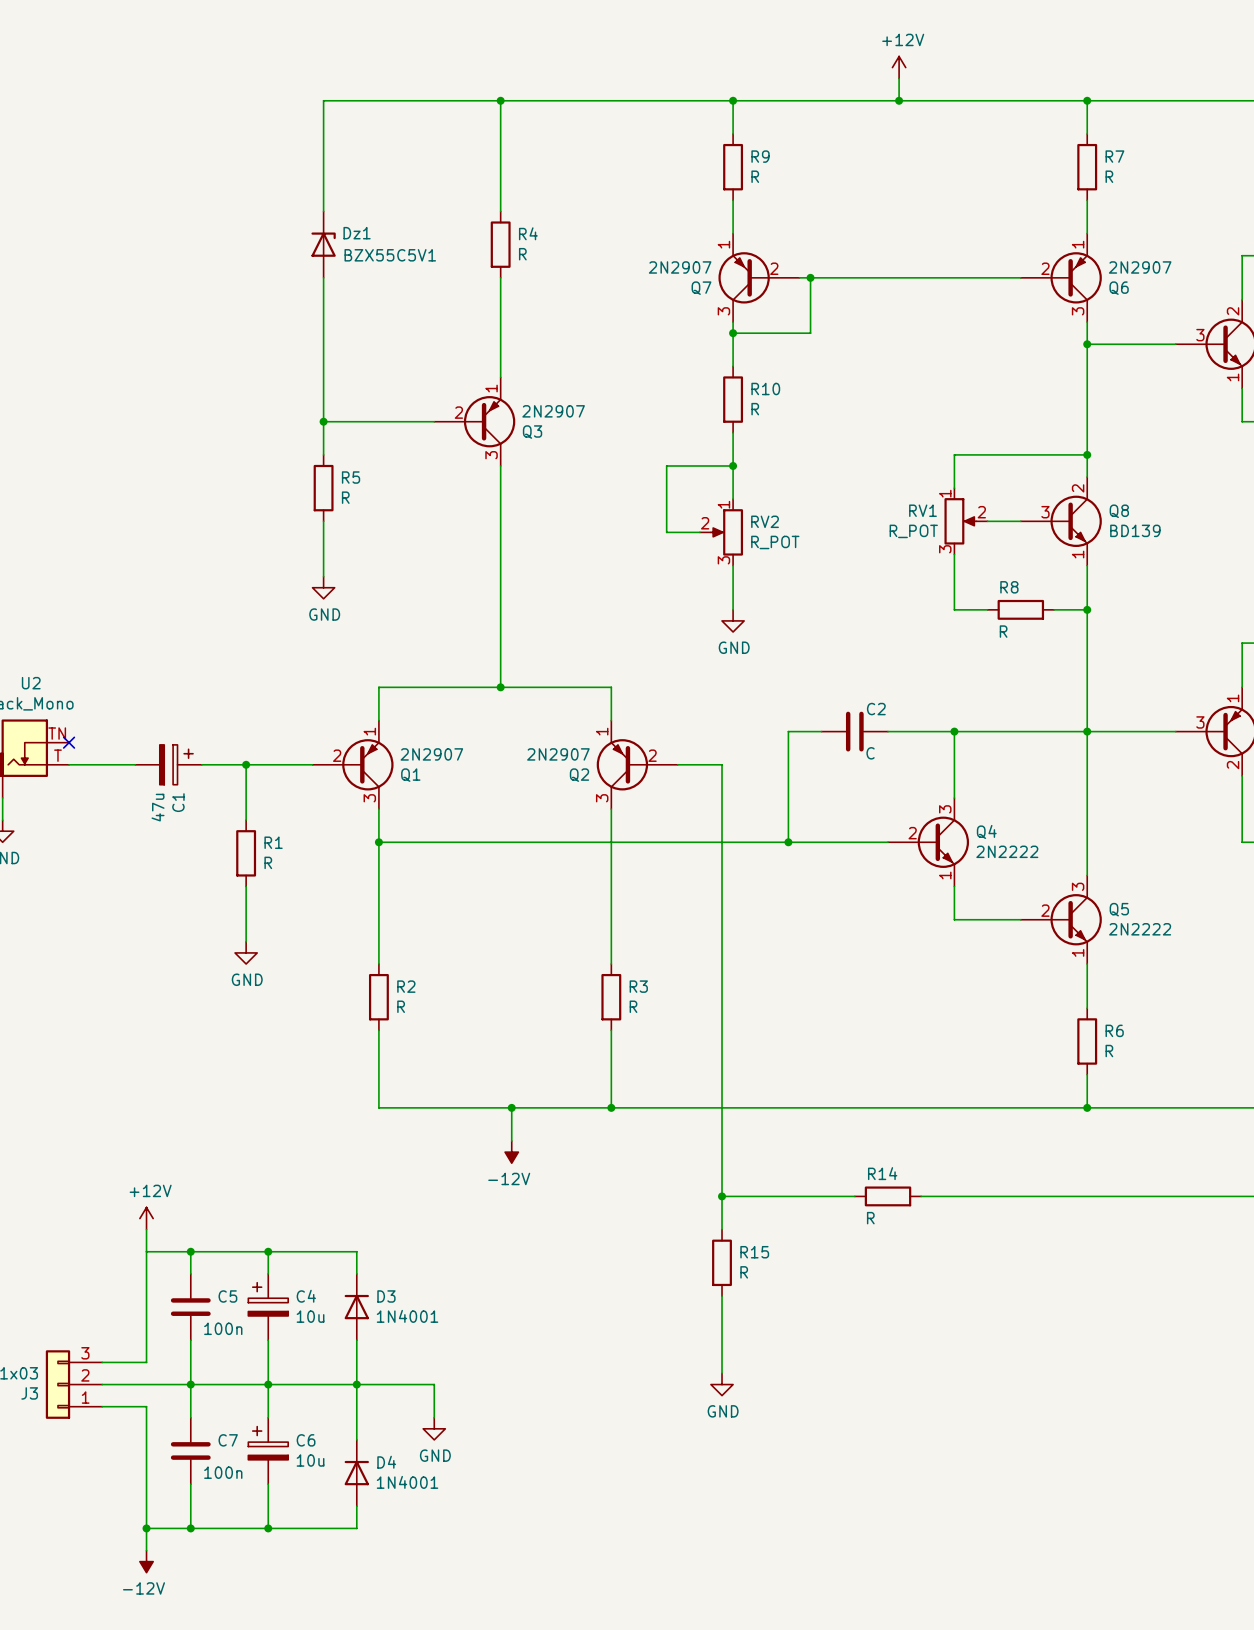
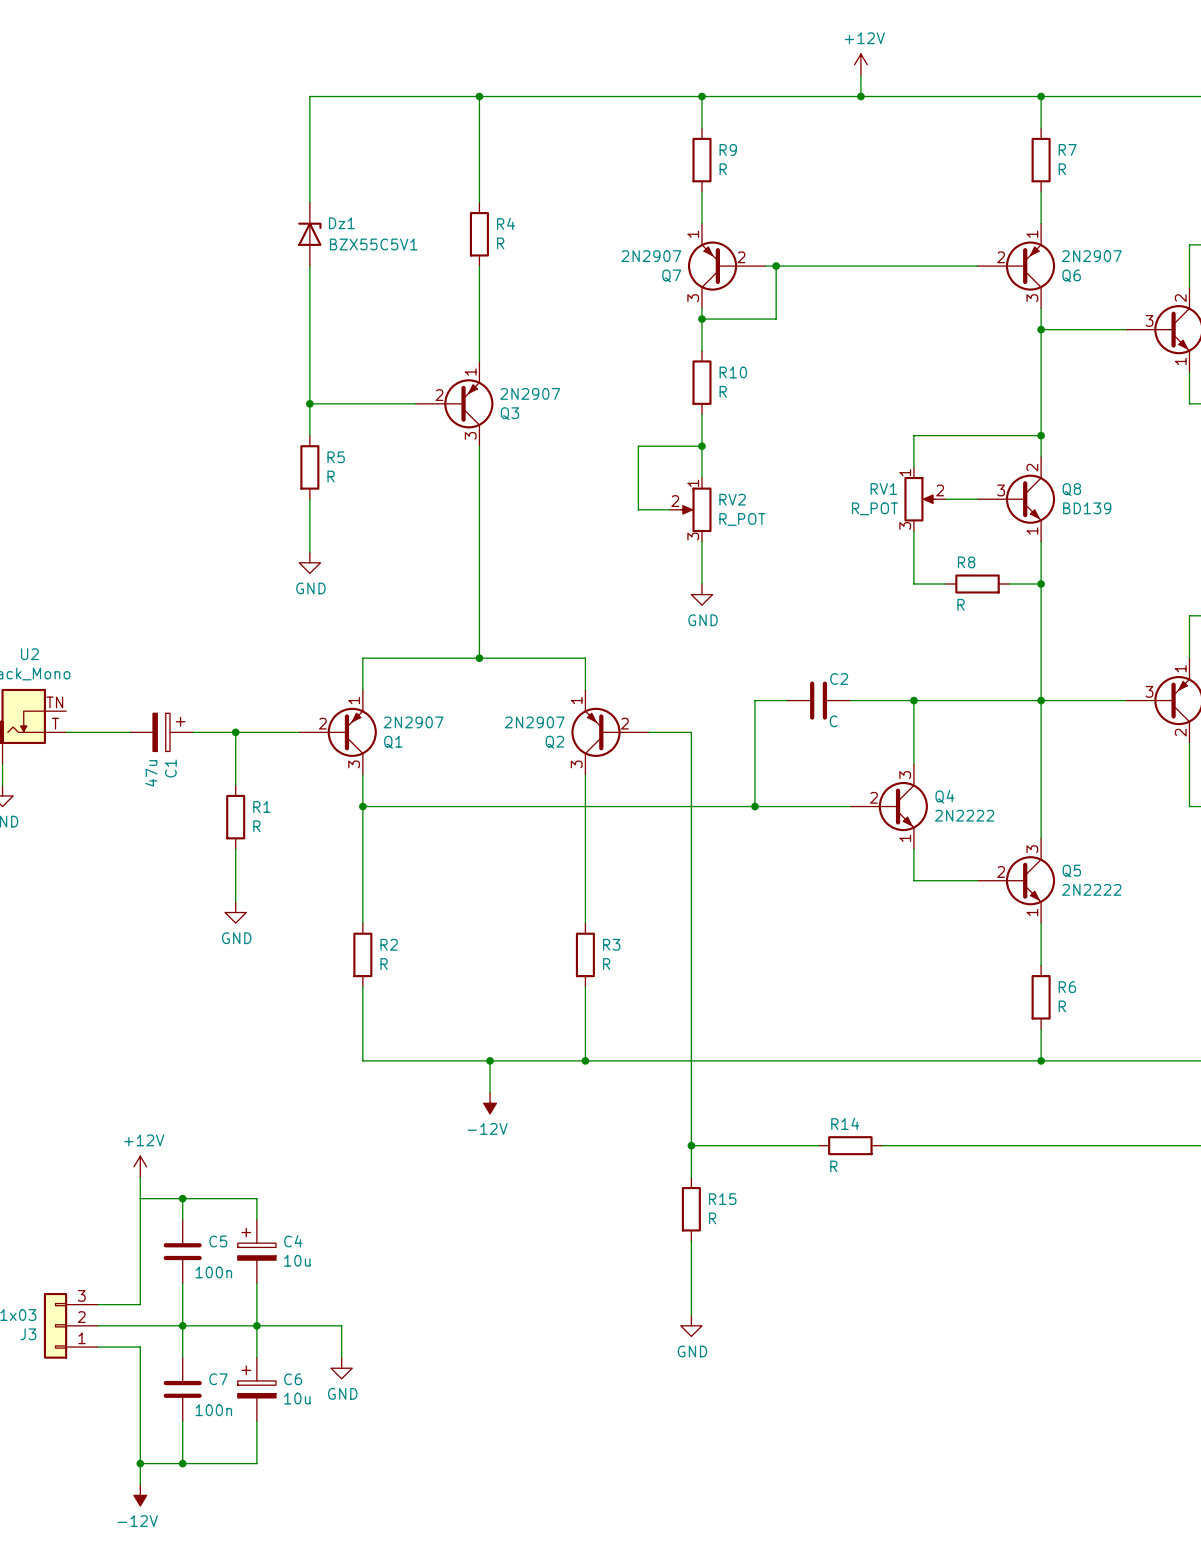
no-connect mark: (69, 742) -> none
wire: (268, 1251) (356, 1251) (356, 1273) -> none
junction: (268, 1251) -> none
D3: 1N4001 (356, 1307) -> none
wire: (356, 1340) (356, 1384) (434, 1384) (434, 1417) -> none
junction: (356, 1384) -> none
power symbol position: GND (434, 1428) -> GND (341, 1368)
D4: 1N4001 (356, 1473) -> none
wire: (356, 1506) (356, 1528) (268, 1528) -> none
junction: (268, 1528) -> none

